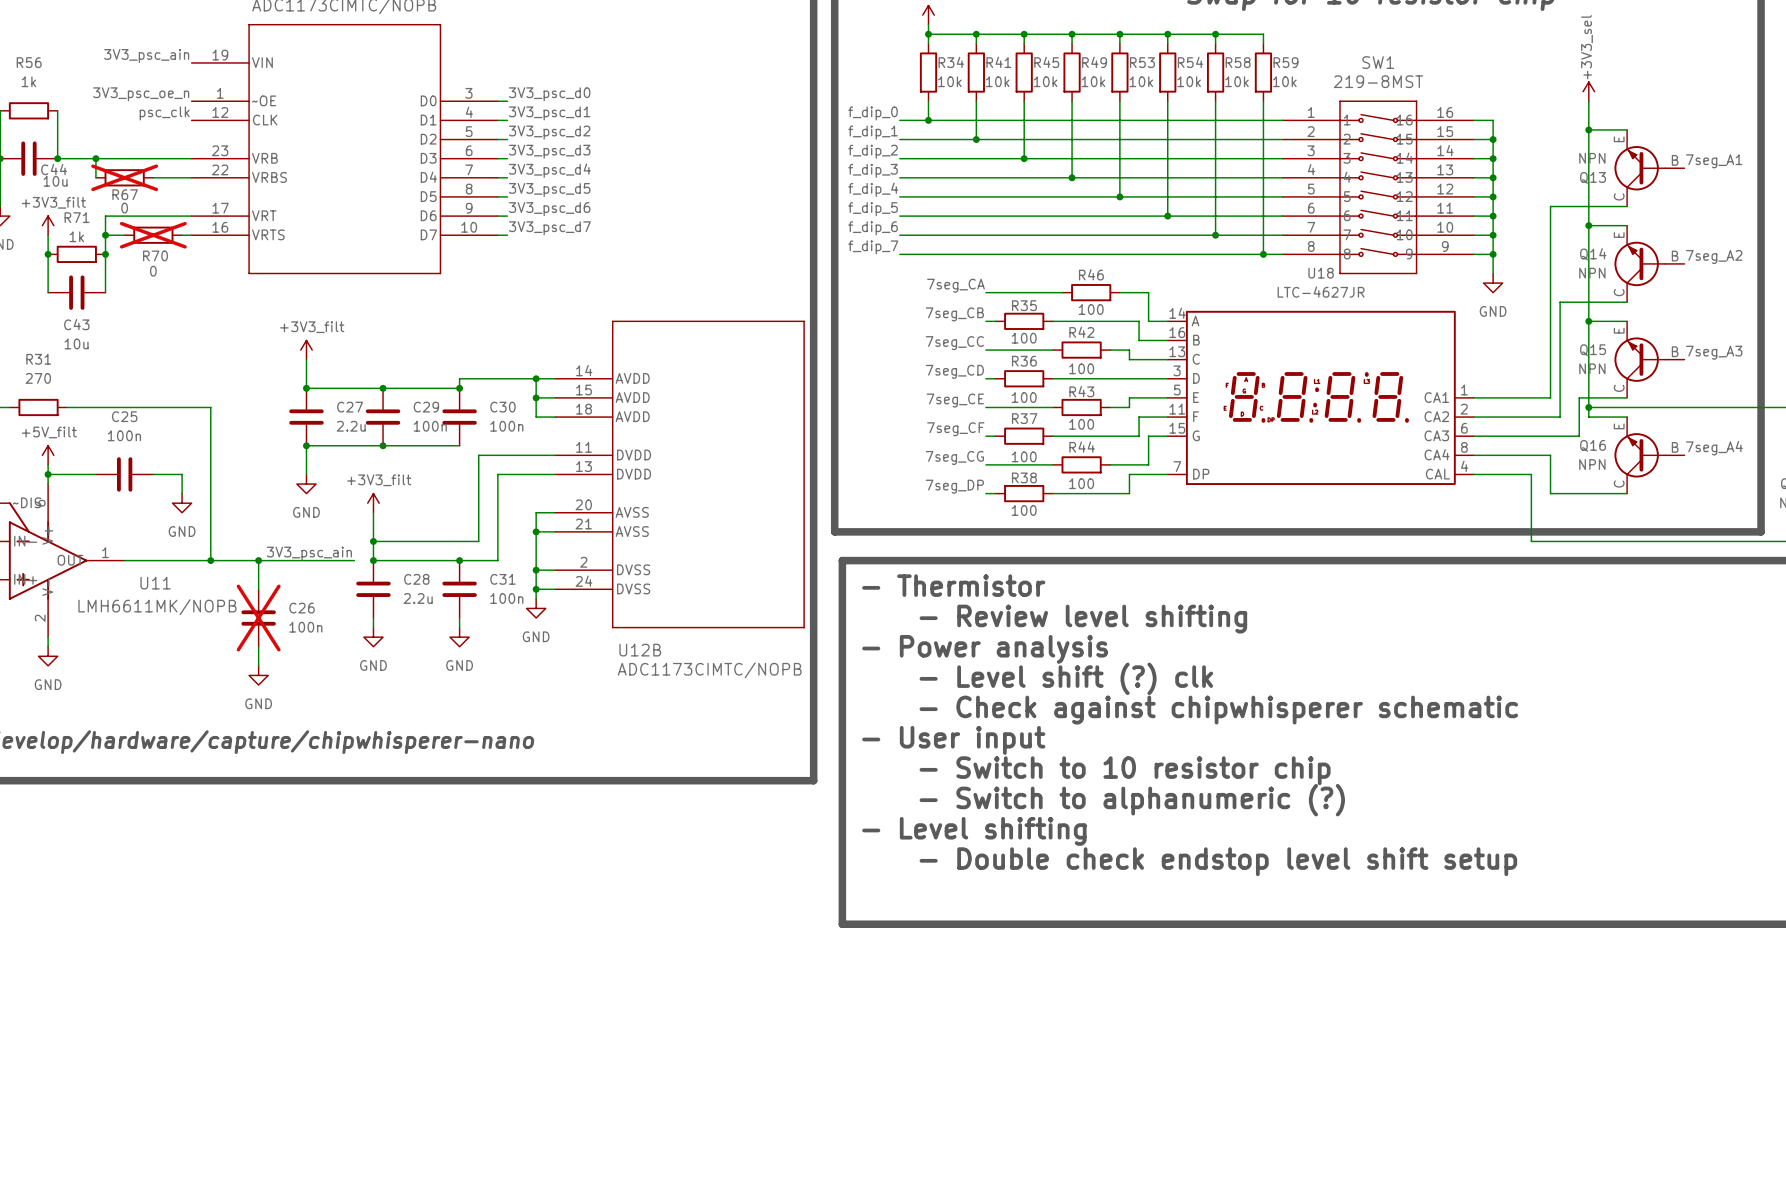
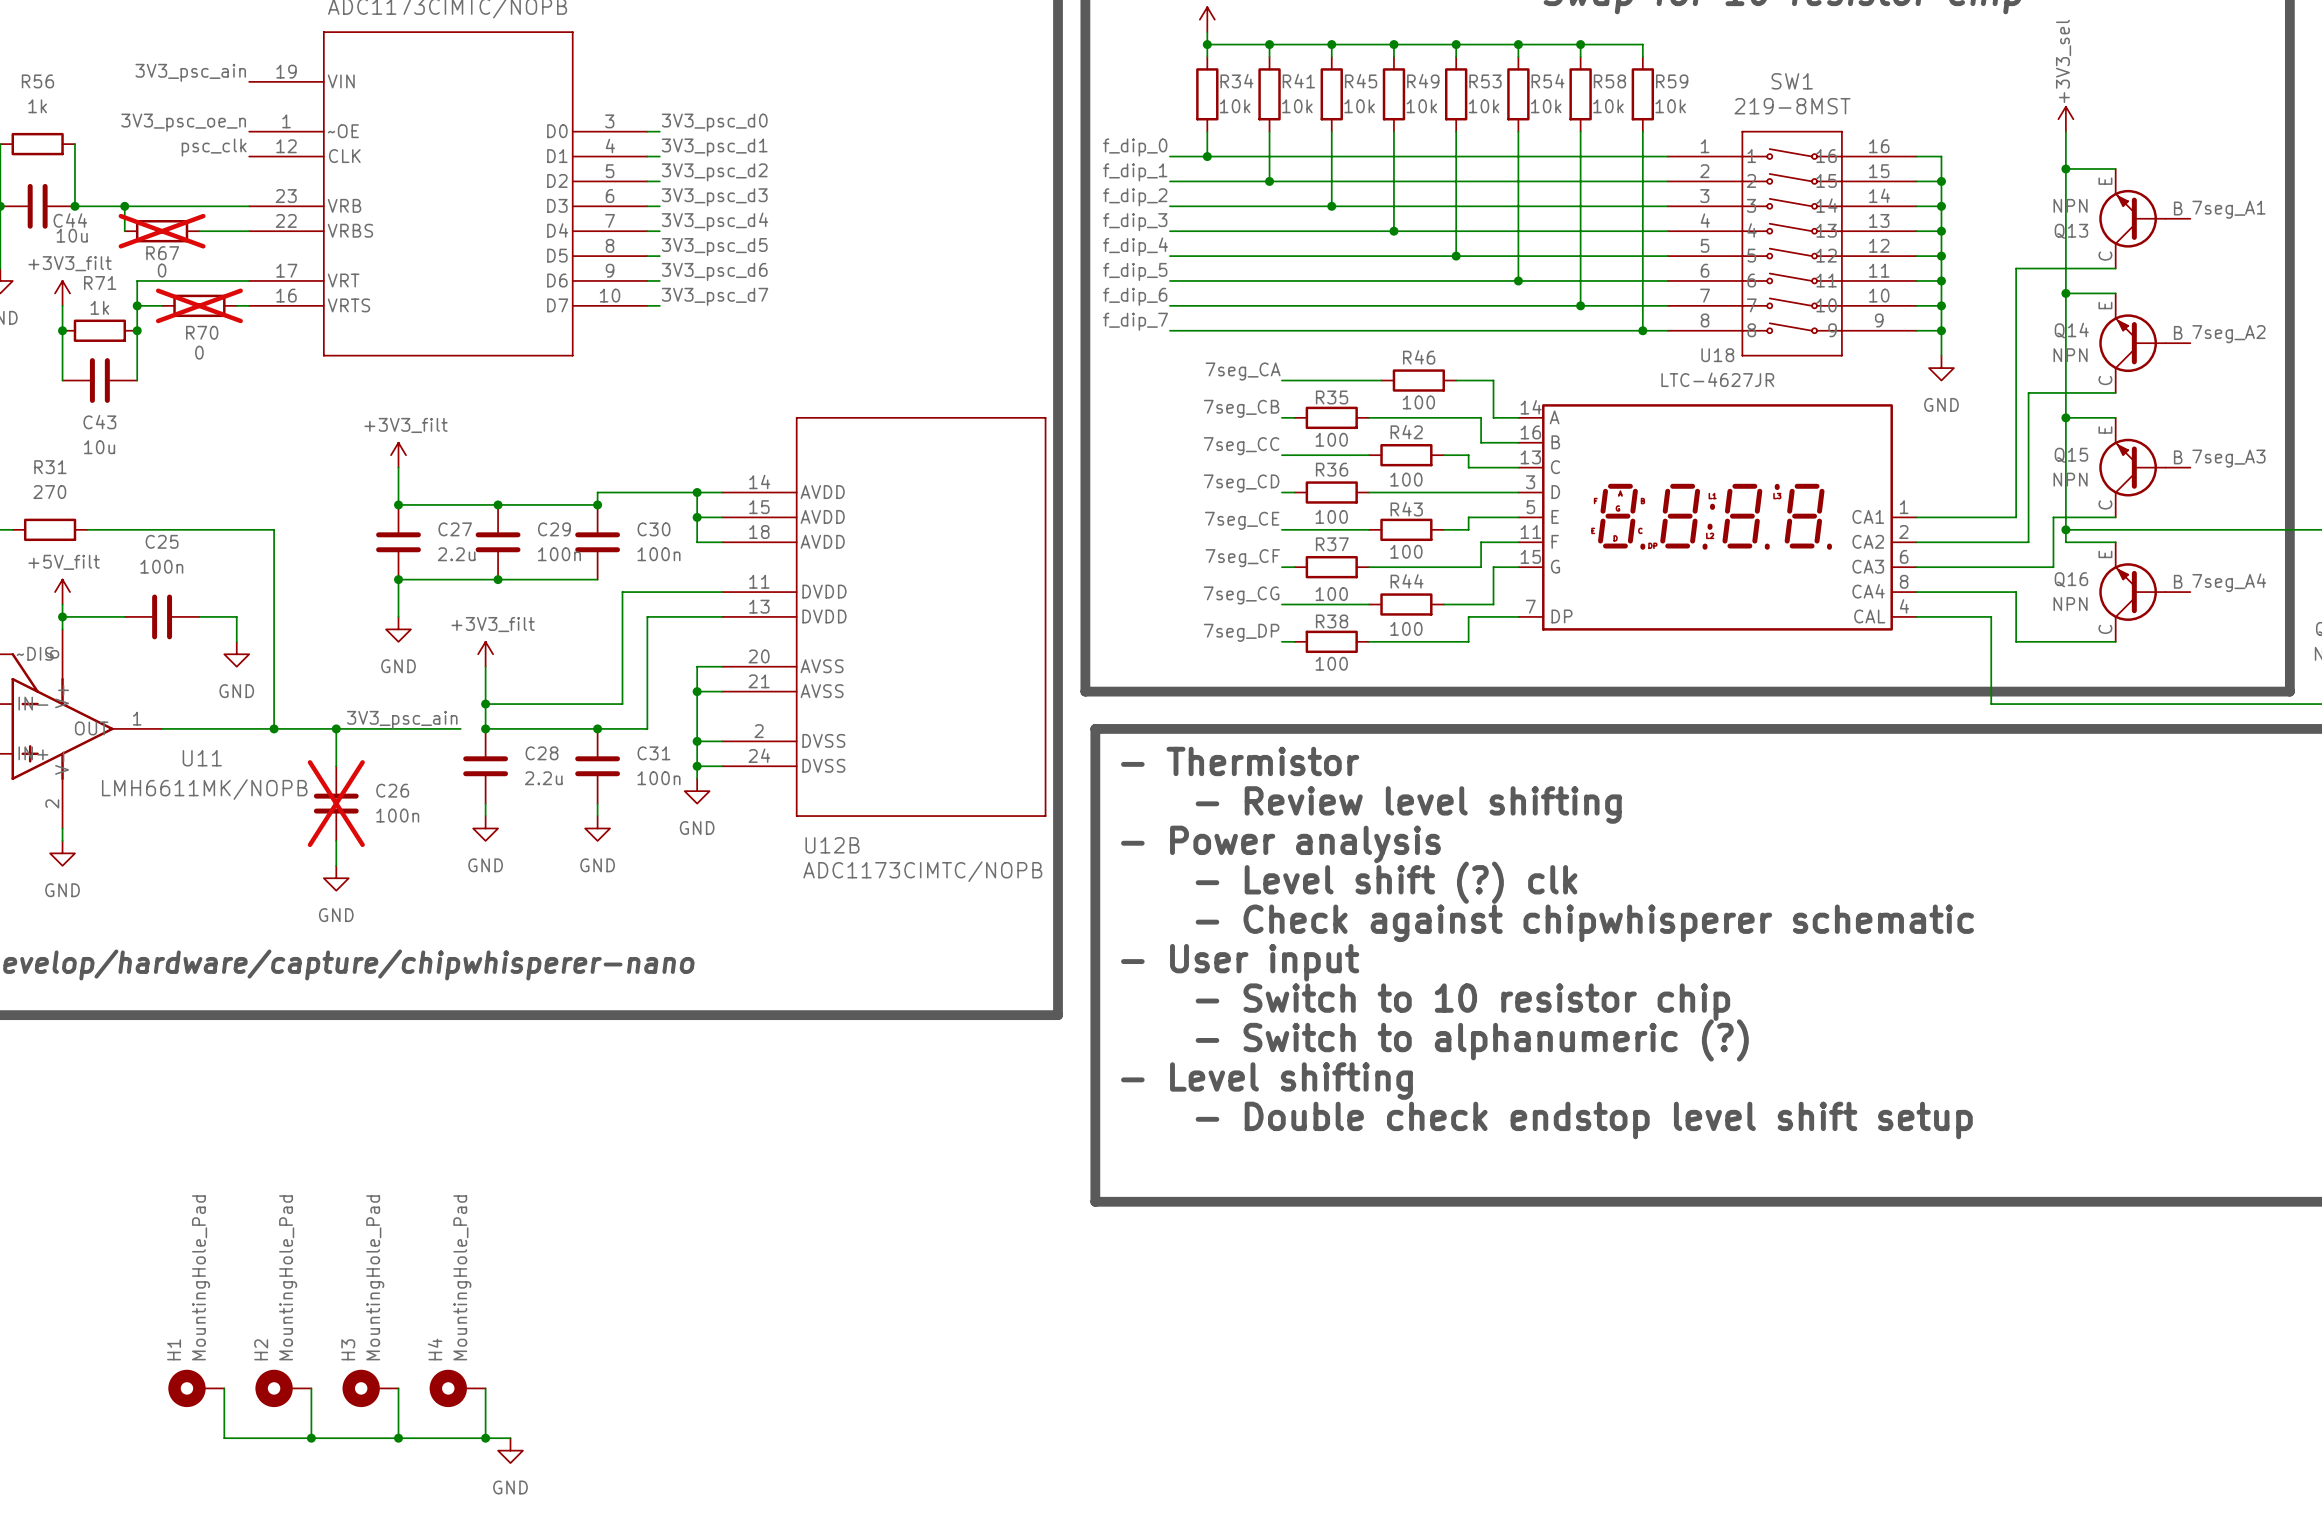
H1: none -> MountingHole_Pad (196, 1388)
wire: none -> (224, 1388) (224, 1438) (510, 1438)
H2: none -> MountingHole_Pad (283, 1388)
wire: none -> (311, 1388) (311, 1438)
H3: none -> MountingHole_Pad (370, 1388)
wire: none -> (398, 1388) (398, 1438)
H4: none -> MountingHole_Pad (457, 1388)
wire: none -> (485, 1388) (485, 1438)
junction: none -> (311, 1438)
junction: none -> (398, 1438)
junction: none -> (485, 1438)
power symbol: none -> GND (510, 1450)

